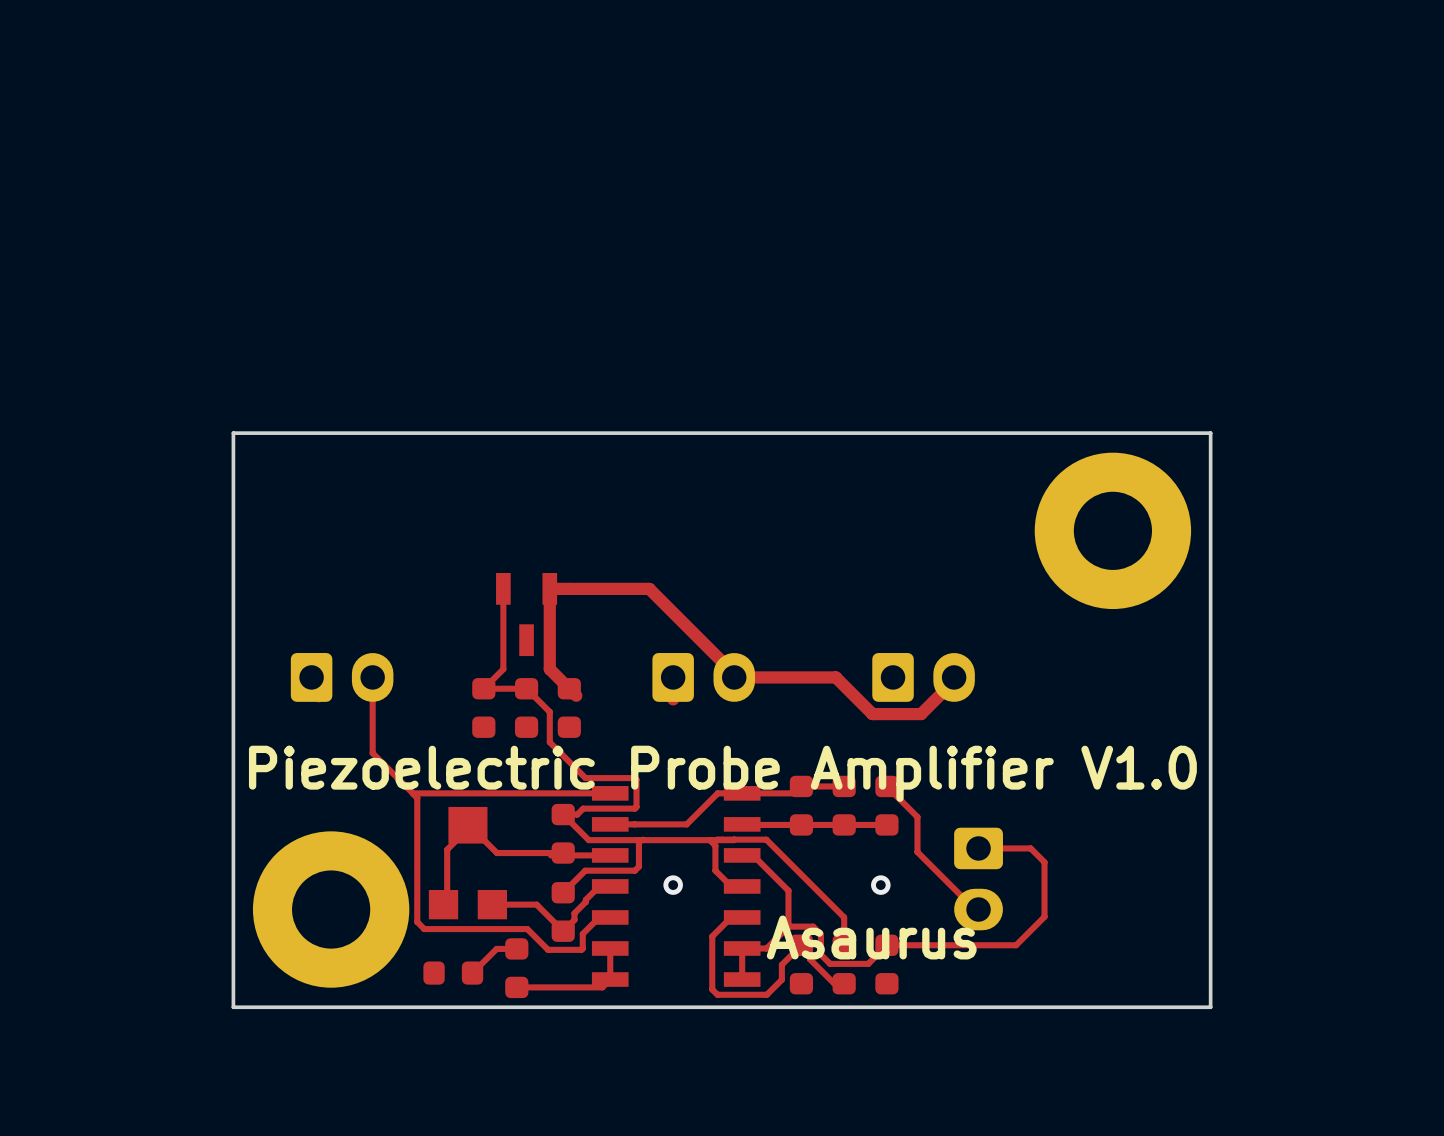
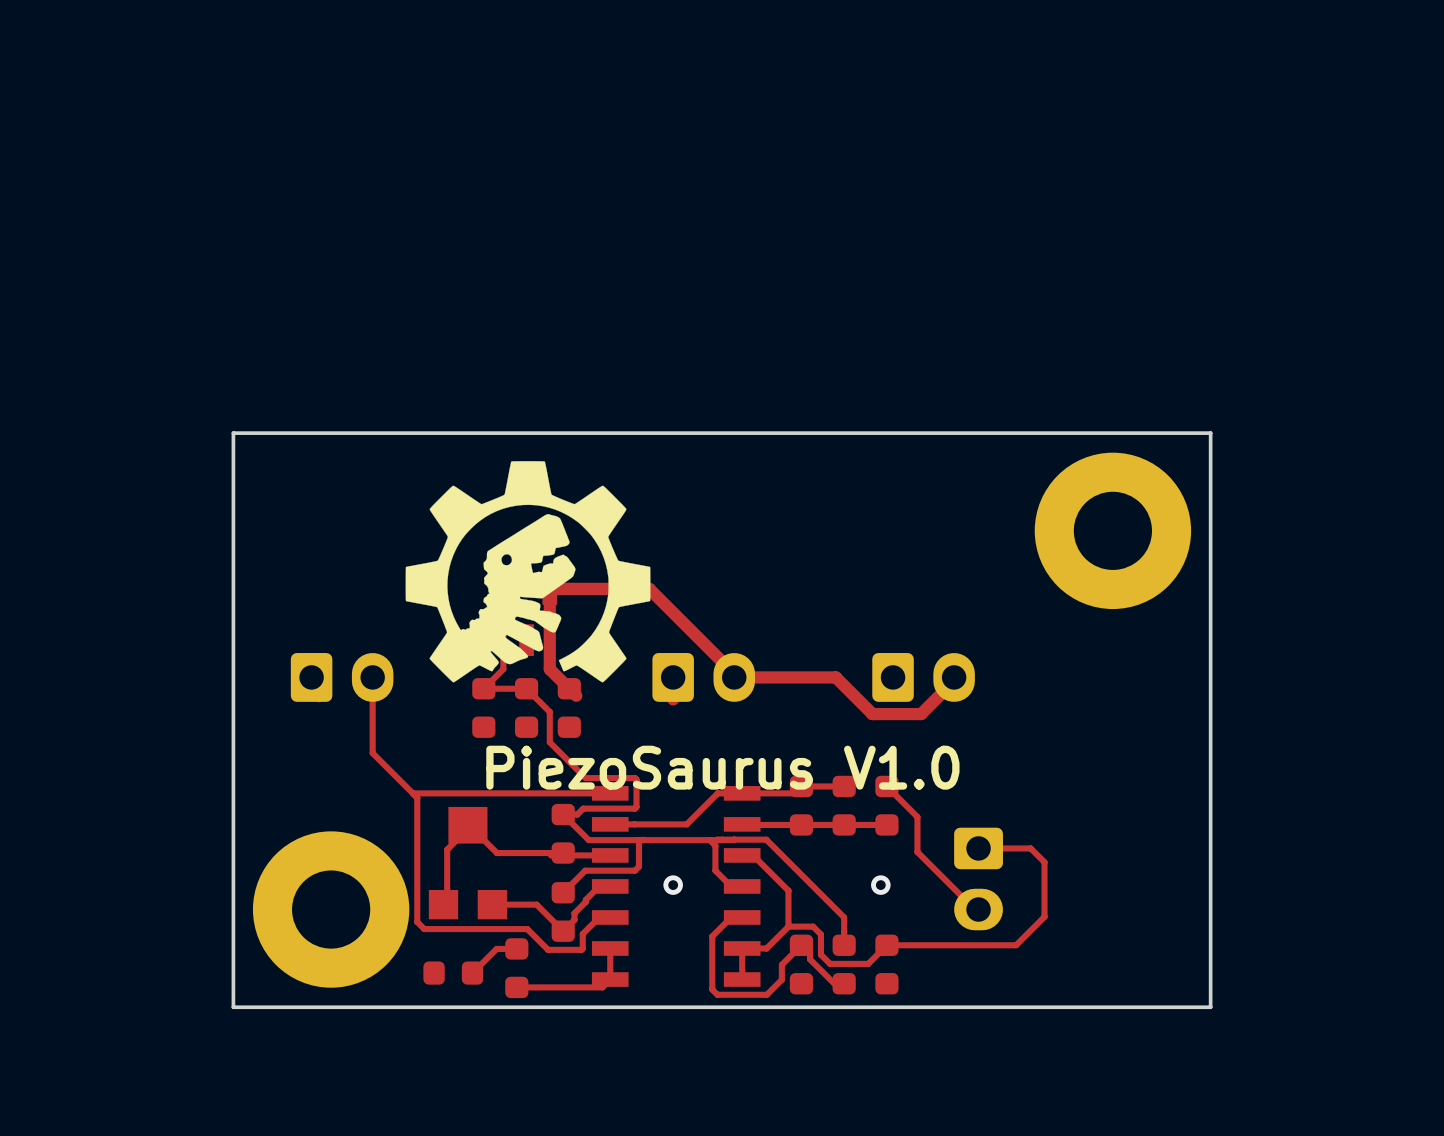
drawing: none -> [405, 461, 651, 683]
text: Piezoelectric Probe Amplifier V1.0 (722, 773) -> PiezoSaurus V1.0 (722, 767)
text: Asaurus (871, 937) -> none

